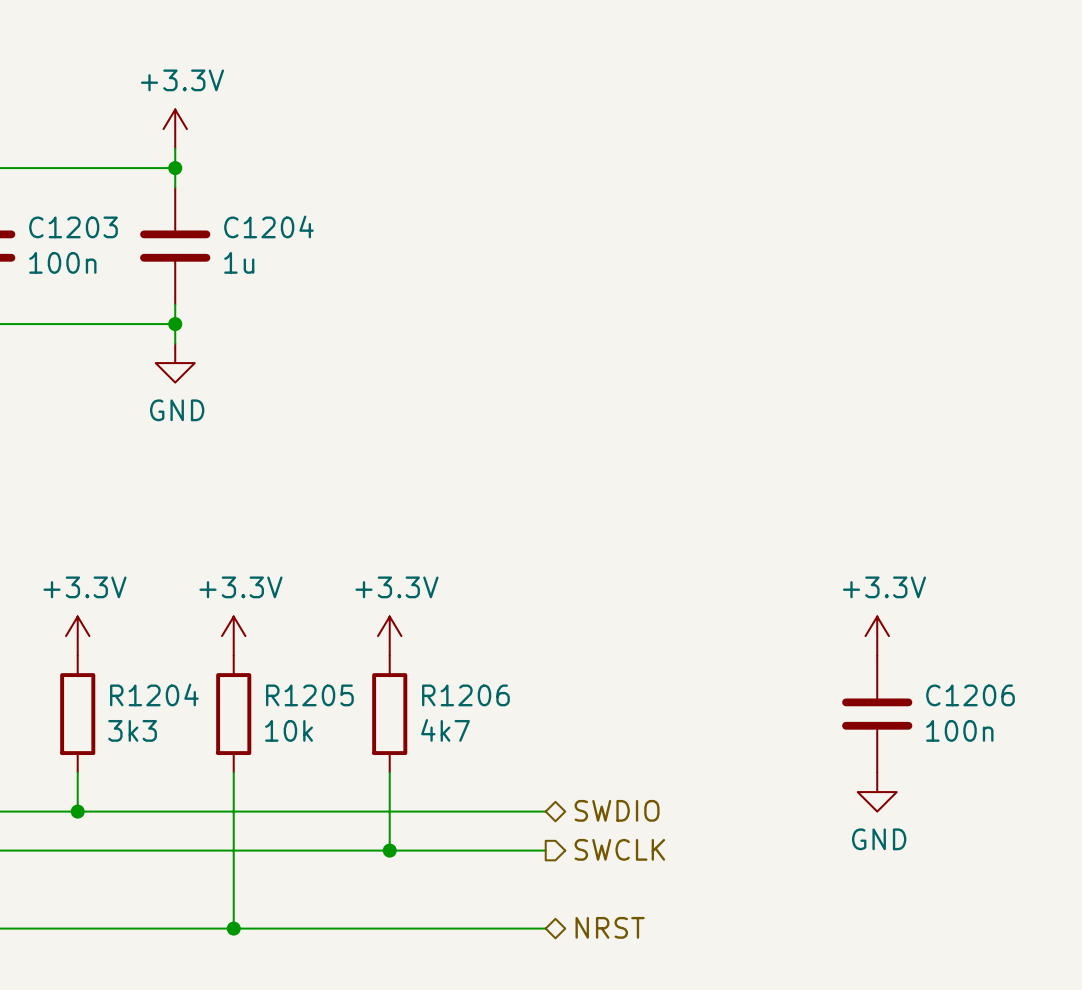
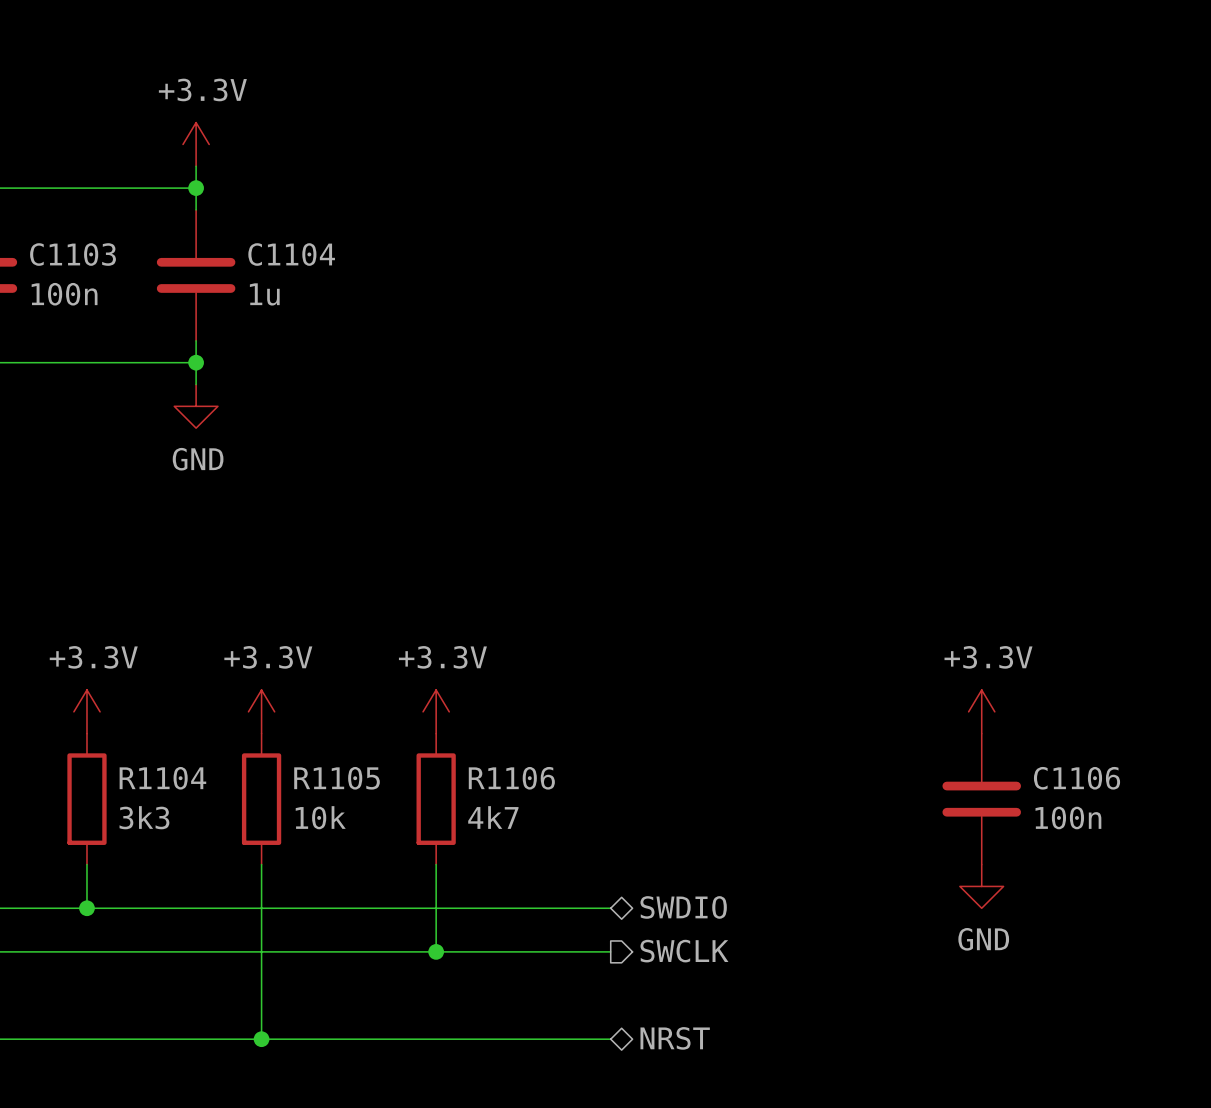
C1204 name: C1204 (268, 226) -> C1104 (291, 254)
C1203 name: C1203 (73, 227) -> C1103 (73, 254)
R1204 name: R1204 (154, 694) -> R1104 (162, 778)
R1205 name: R1205 (309, 695) -> R1105 (337, 778)
R1206 name: R1206 (465, 695) -> R1106 (511, 778)
C1206 name: C1206 (970, 695) -> C1106 (1077, 778)

